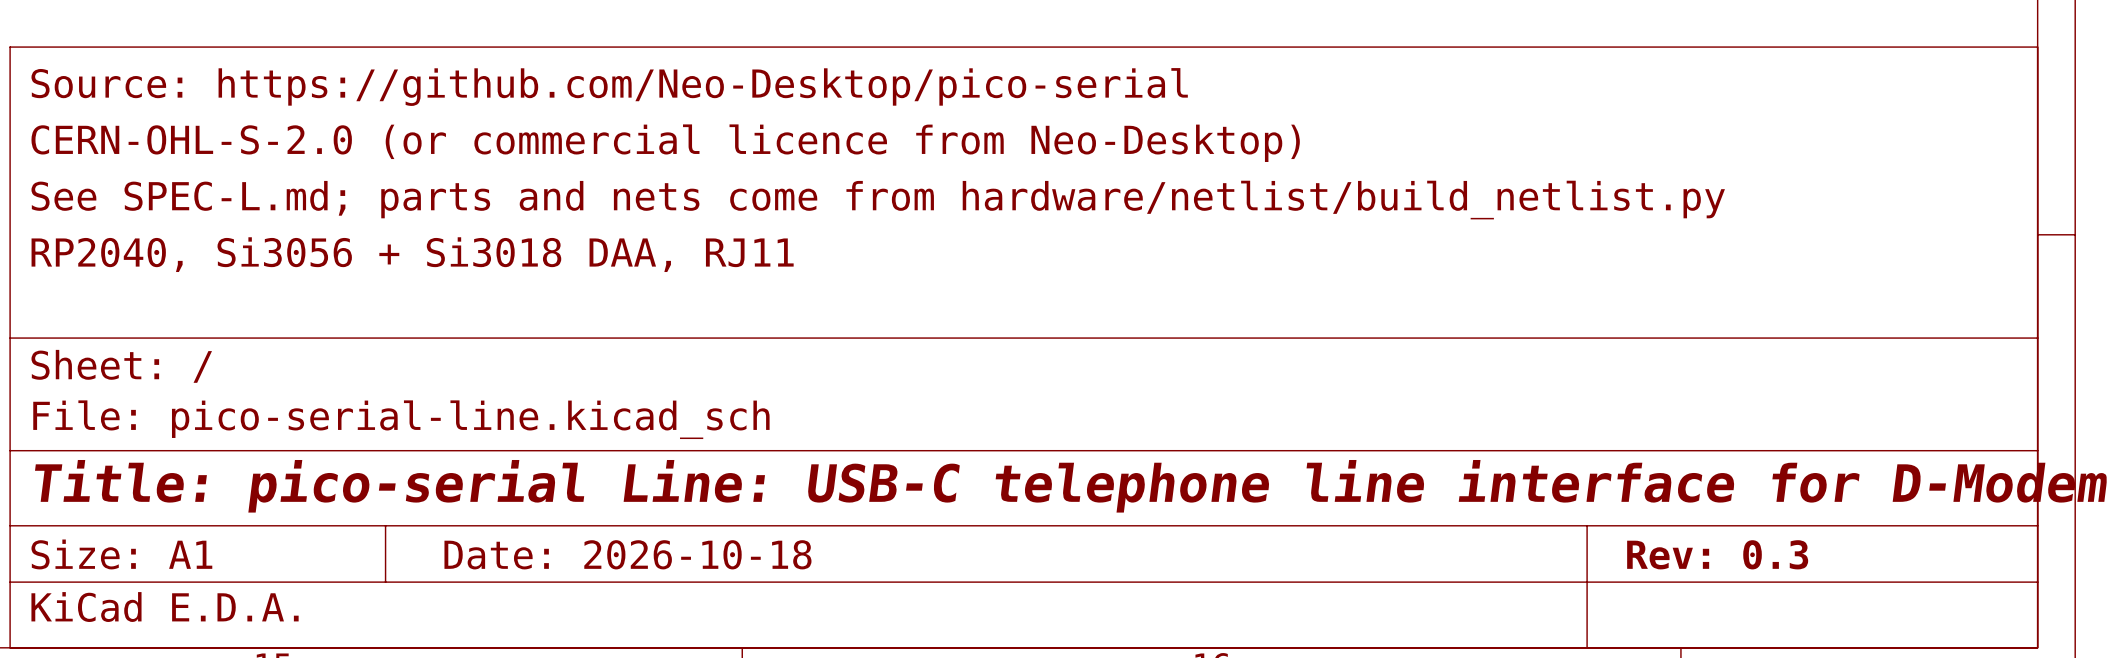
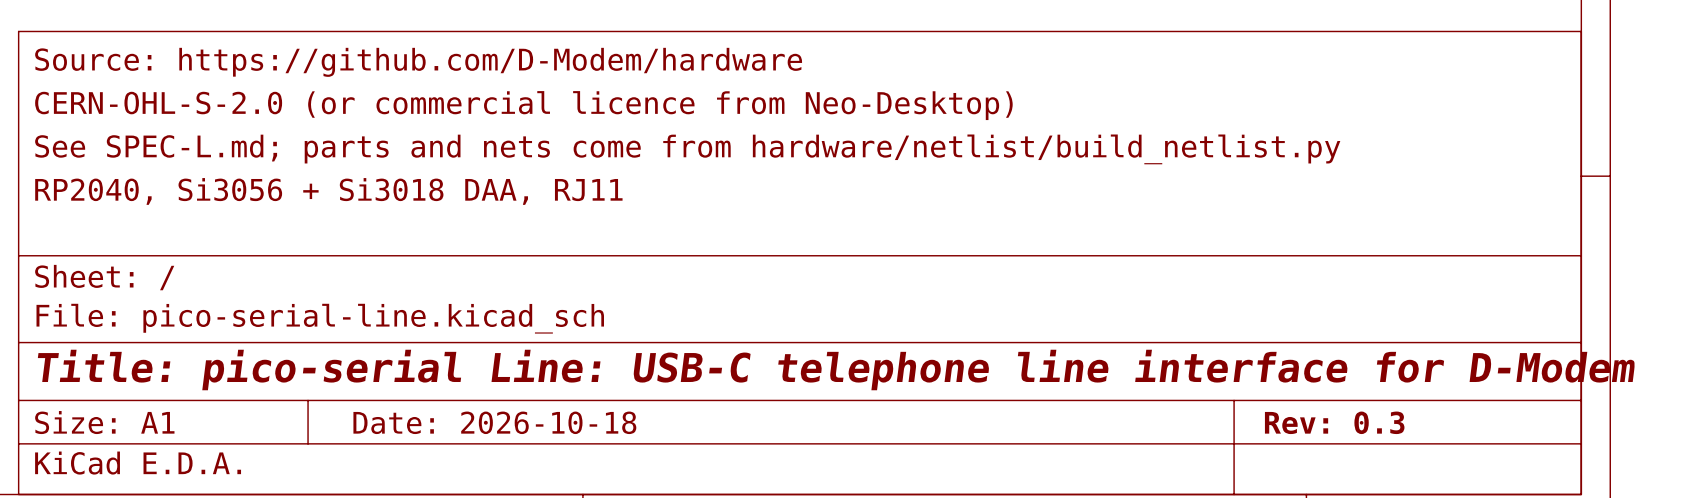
title block: Source: https://github.com/Neo-Desktop/pico-serial (609, 87) -> Source: https://github.com/D-Modem/hardware (418, 62)

